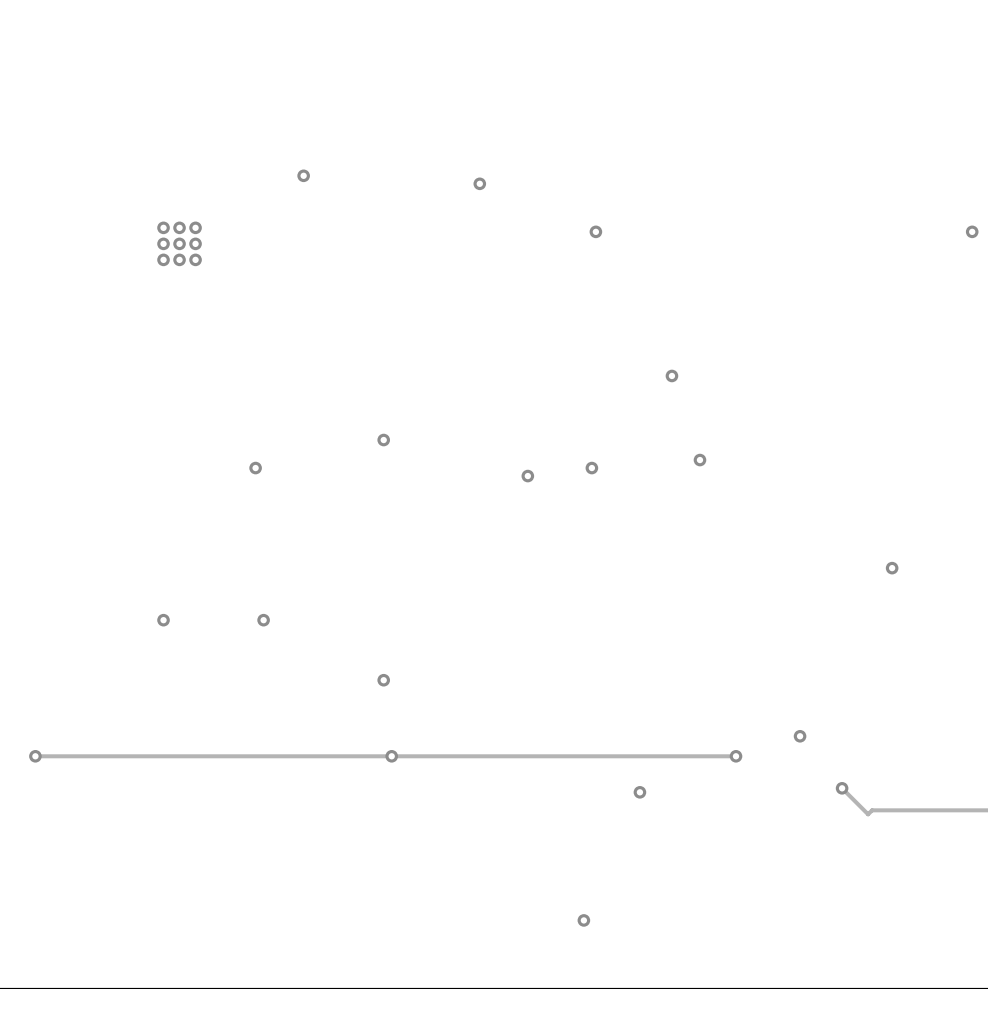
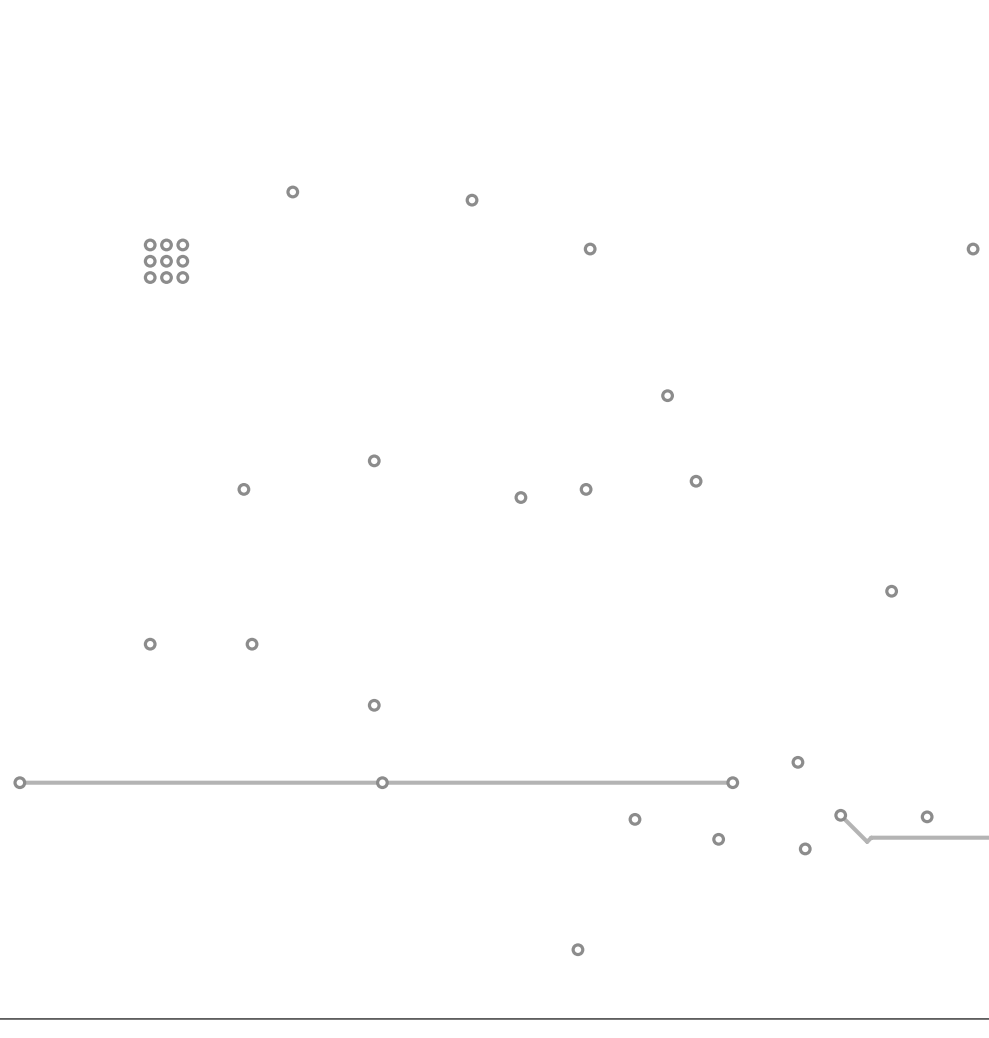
via: none -> (927, 816)
via: none -> (718, 839)
via: none -> (805, 848)

